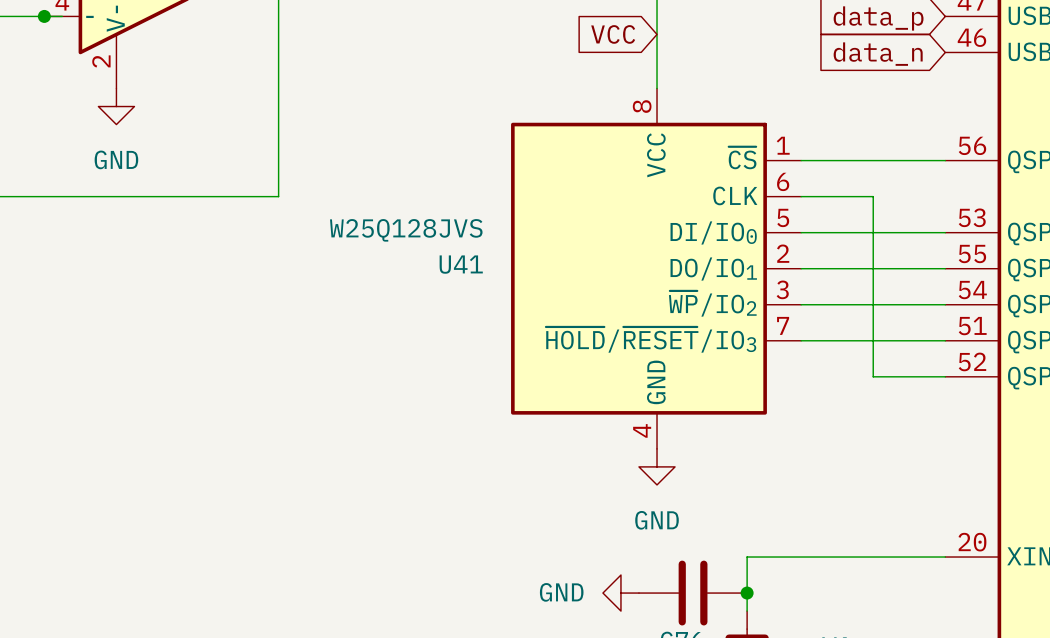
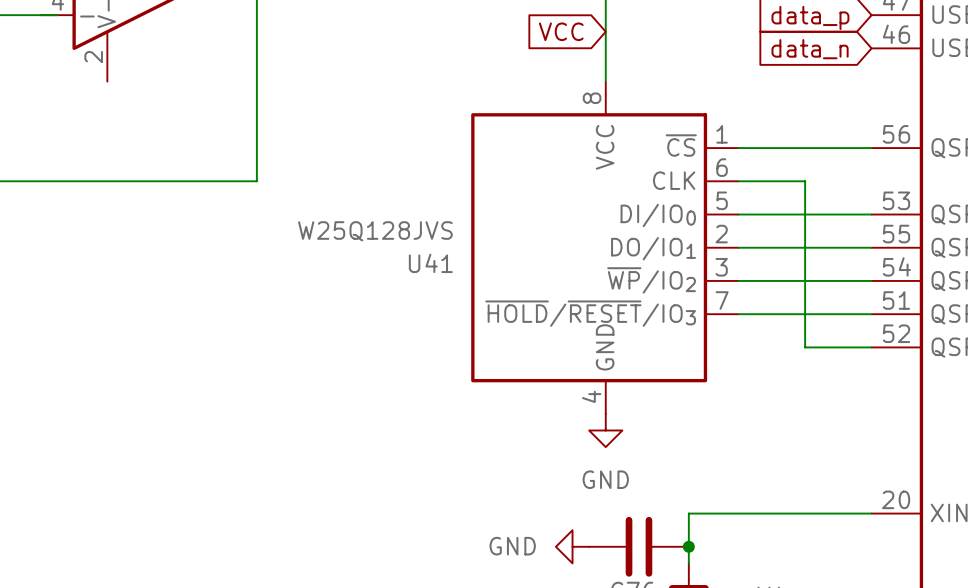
junction: (44, 16) -> none
power symbol: GND (116, 106) -> none
U41 value position: W25Q128JVS (406, 230) -> W25Q128JVS (375, 231)
U41 name position: U41 (461, 264) -> U41 (430, 263)

